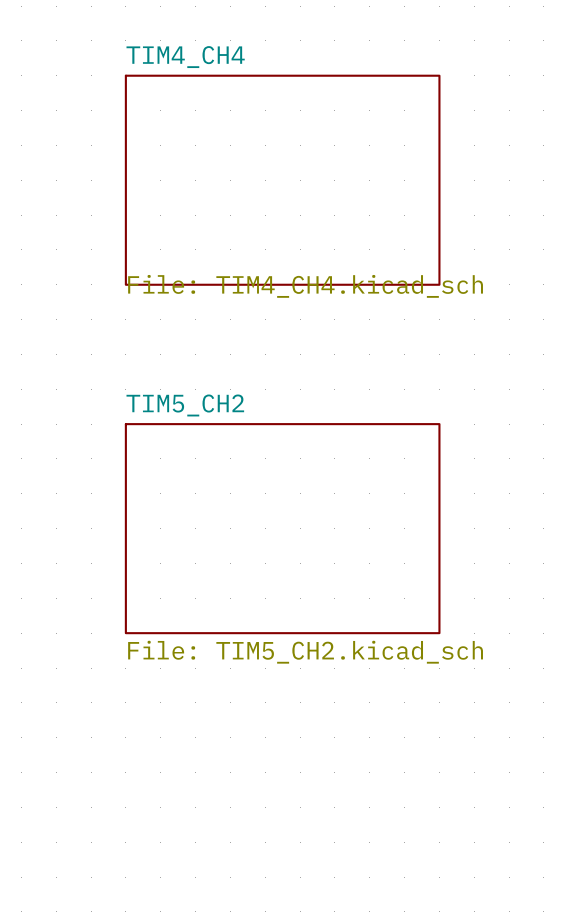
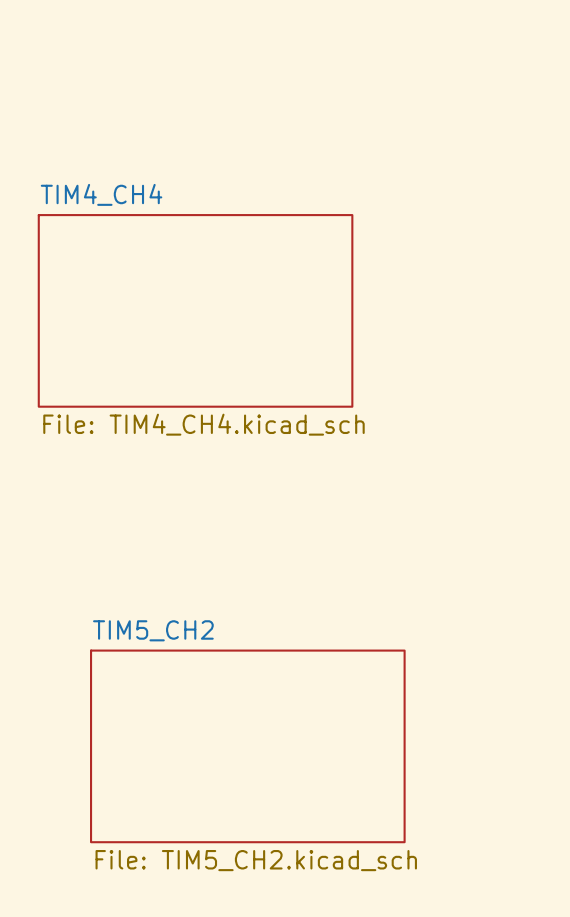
sheet TIM4_CH4 shape: [124, 74, 441, 286] -> [37, 214, 354, 408]
sheet TIM5_CH2 shape: [124, 423, 441, 635] -> [89, 649, 406, 844]

